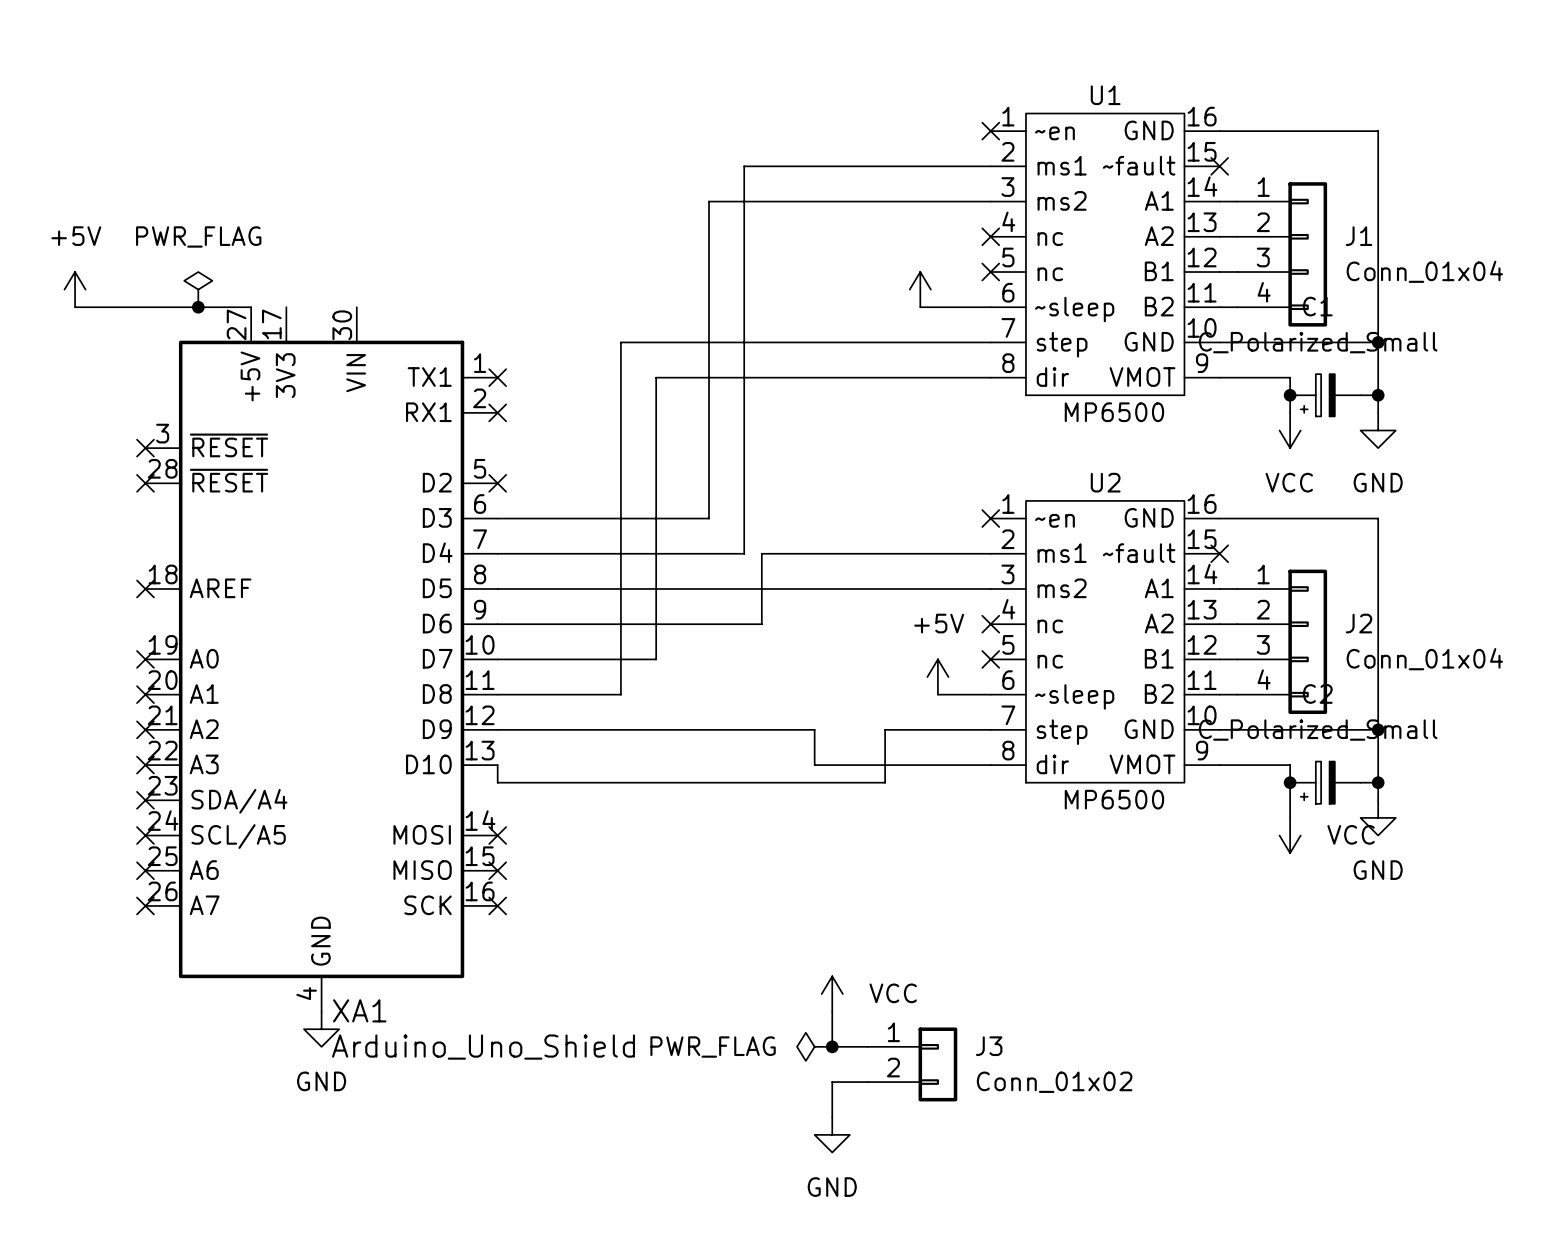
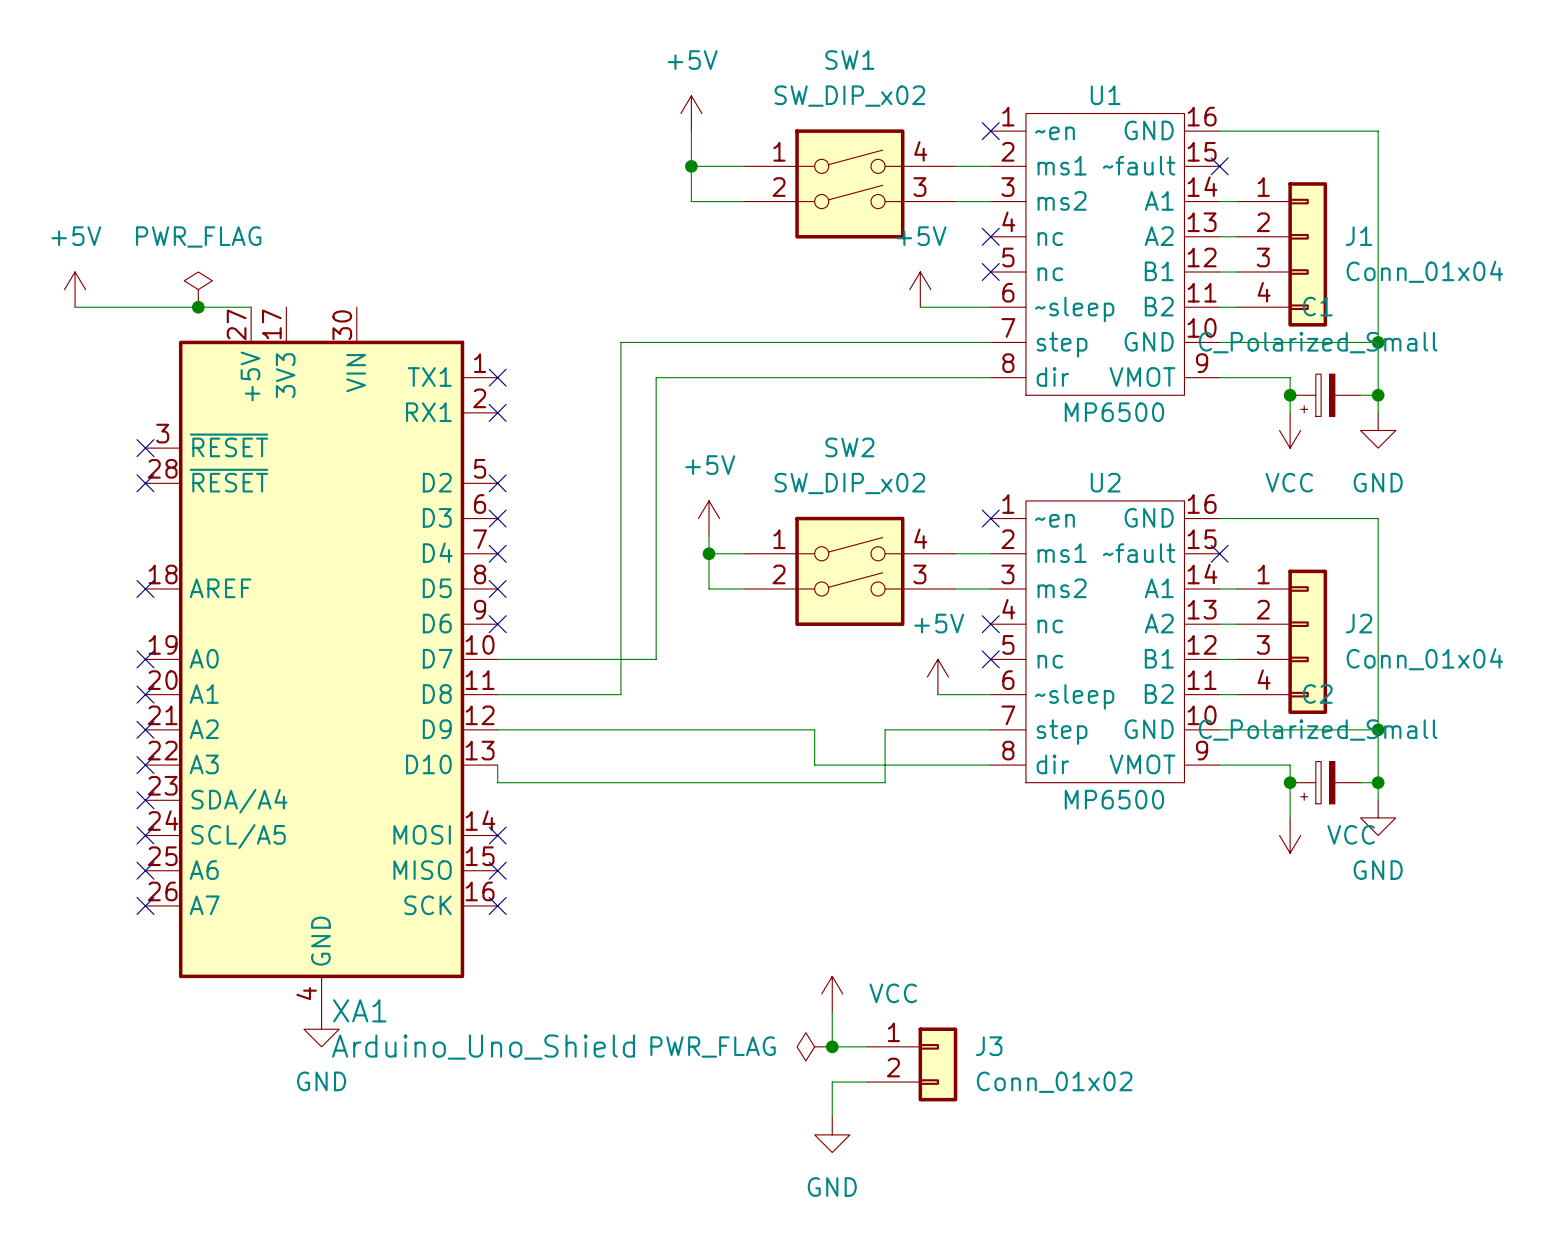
power symbol: none -> +5V (691, 113)
wire: none -> (691, 166) (744, 166)
junction: none -> (691, 166)
wire: (955, 166) (744, 166) (744, 553) -> none
SW1: none -> SW_DIP_x02 (849, 183)
wire: (708, 201) (708, 518) (497, 518) -> (708, 201) (691, 201) (691, 131)
power symbol text: none -> +5V (921, 236)
no-connect mark: none -> (497, 518)
power symbol: none -> +5V (708, 518)
wire: (497, 553) (708, 553) -> none
no-connect mark: none -> (497, 553)
junction: none -> (708, 553)
wire: (955, 553) (761, 553) (761, 624) (497, 624) -> none
SW2: none -> SW_DIP_x02 (849, 571)
wire: (497, 588) (708, 588) -> (708, 536) (708, 588)
no-connect mark: none -> (497, 588)
no-connect mark: none -> (497, 624)

